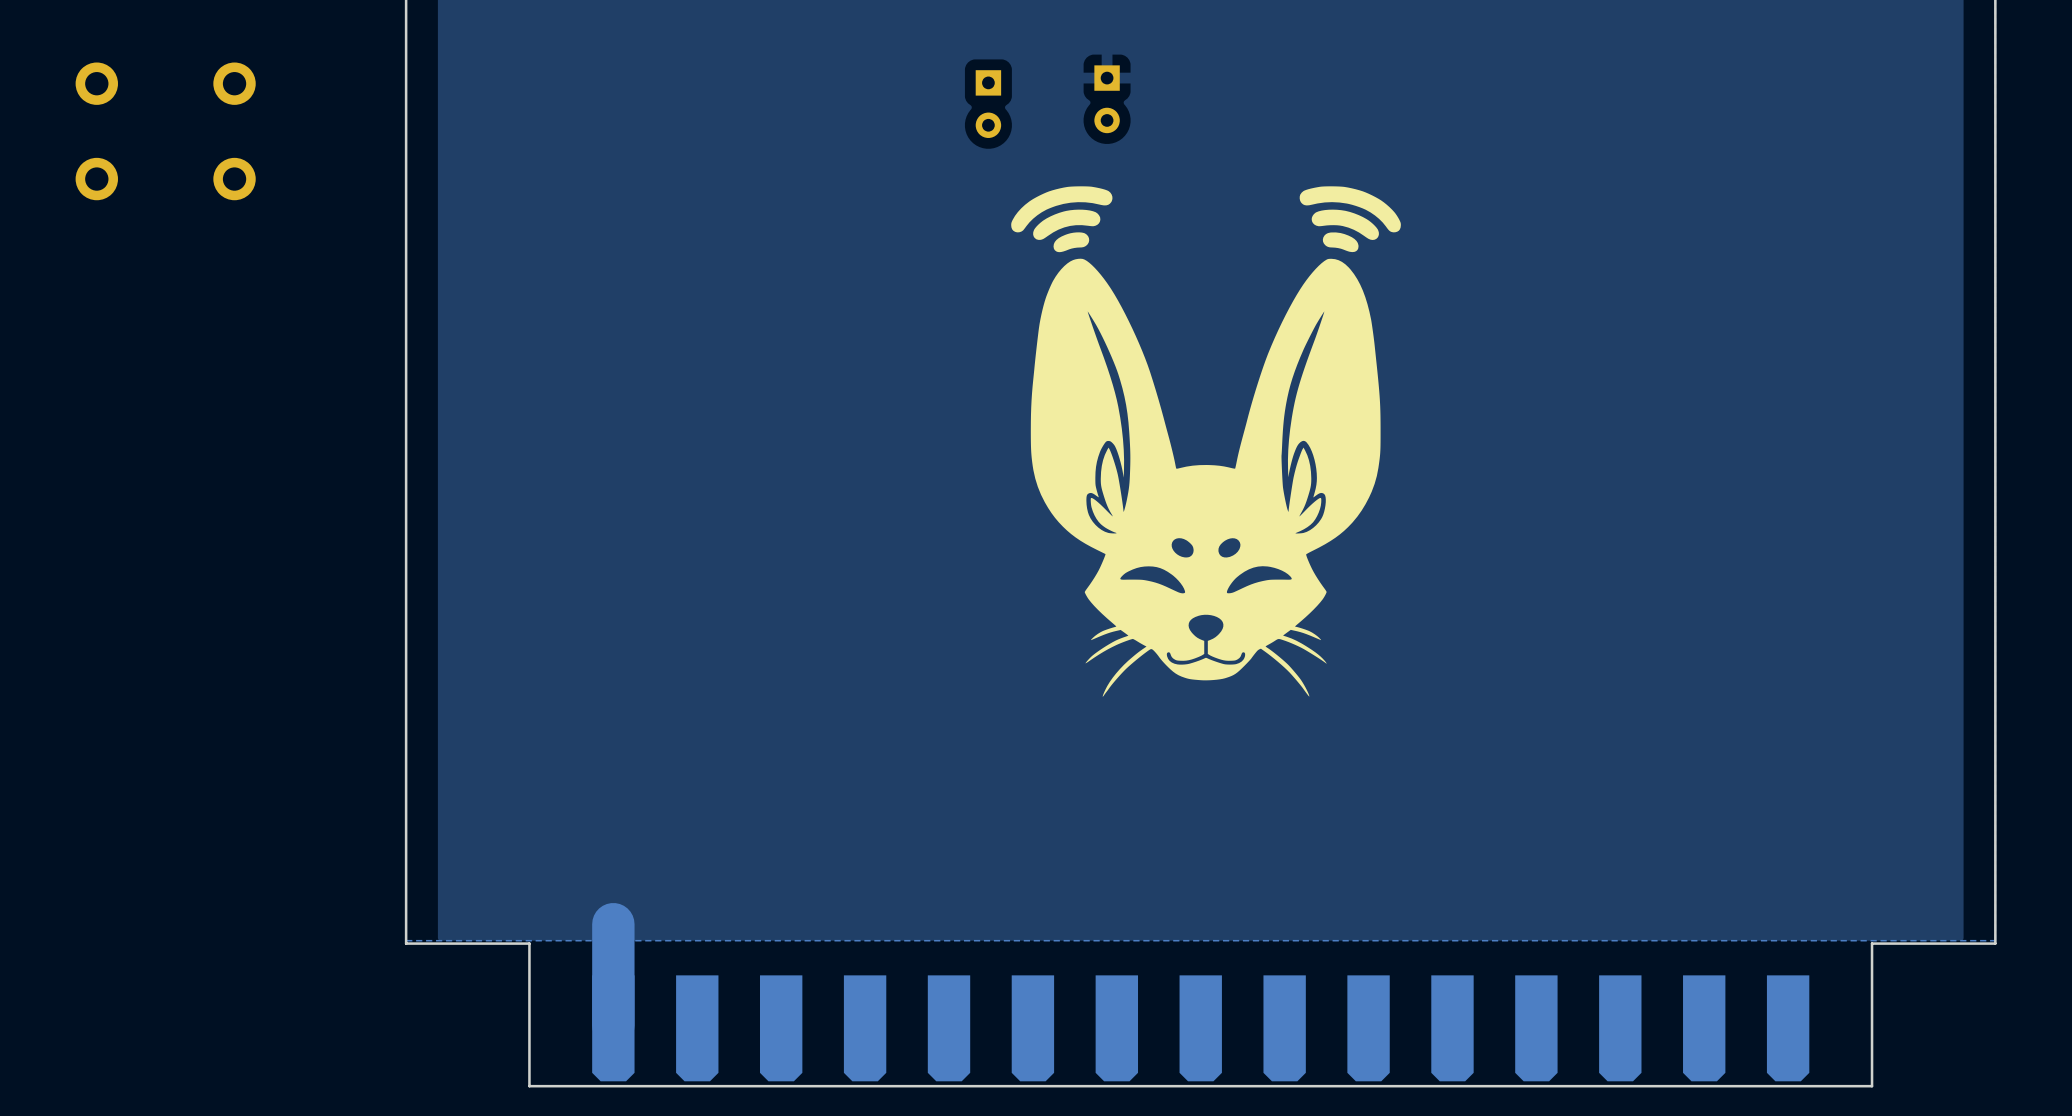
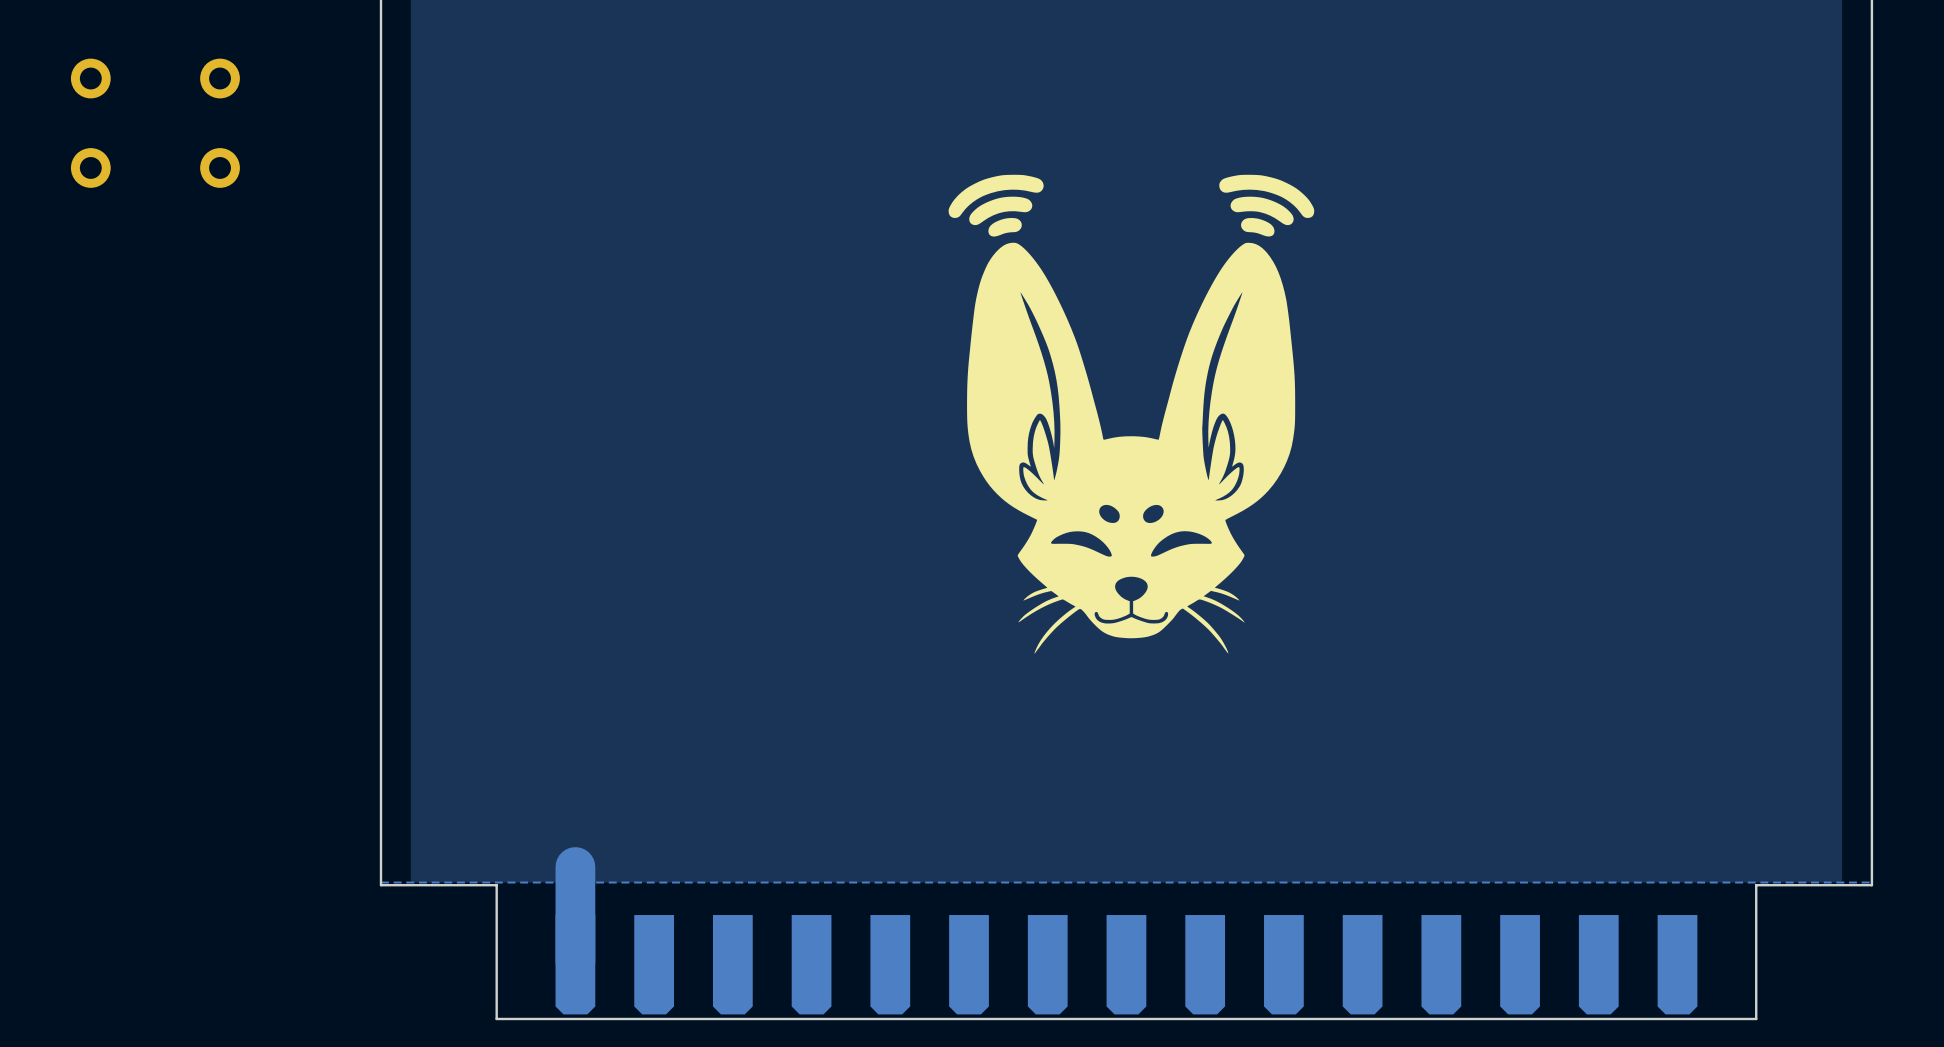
part: (1107, 99) -> none
part: (988, 104) -> none

